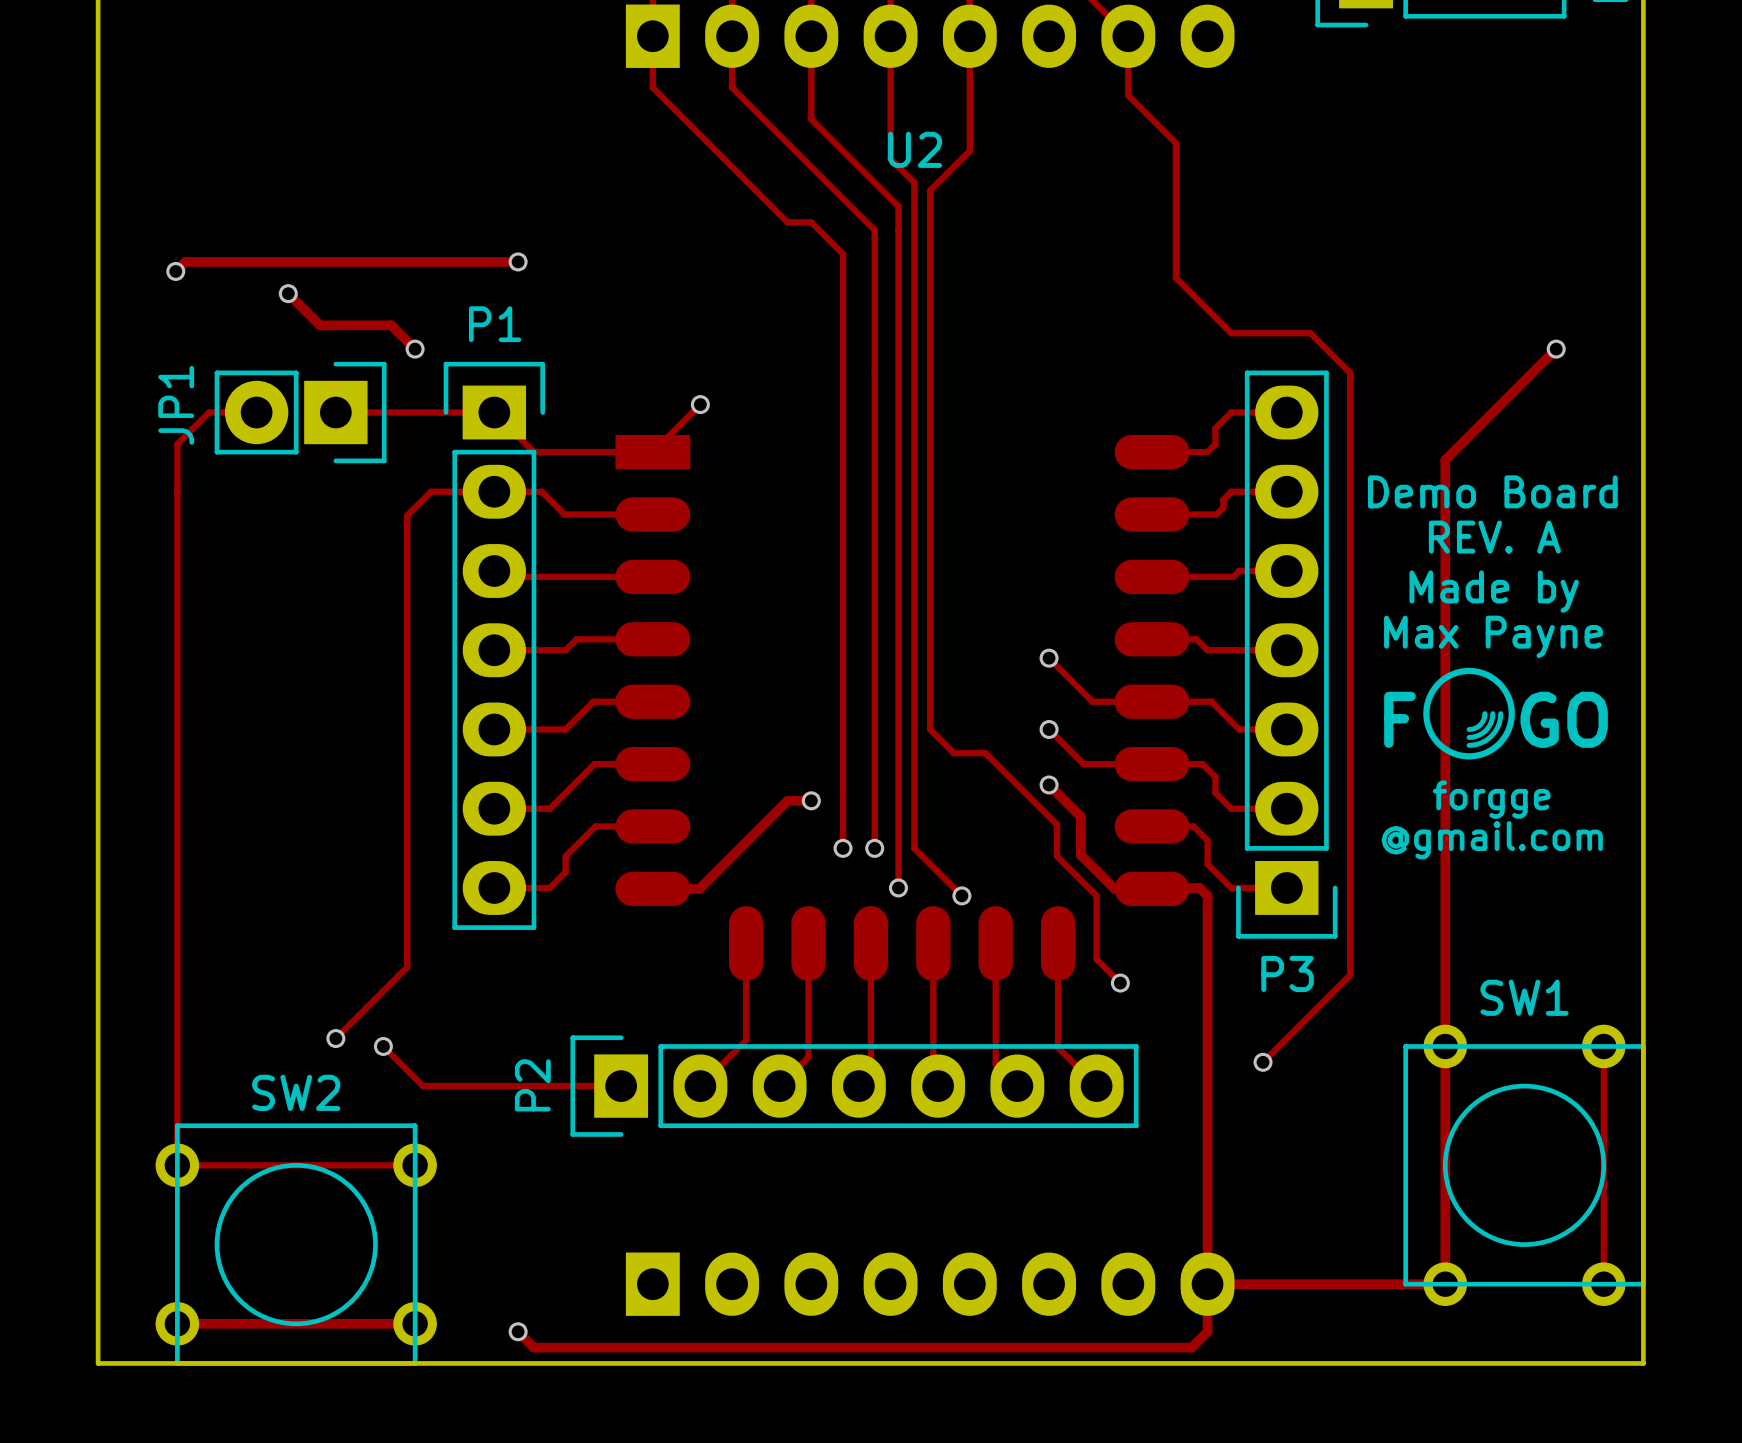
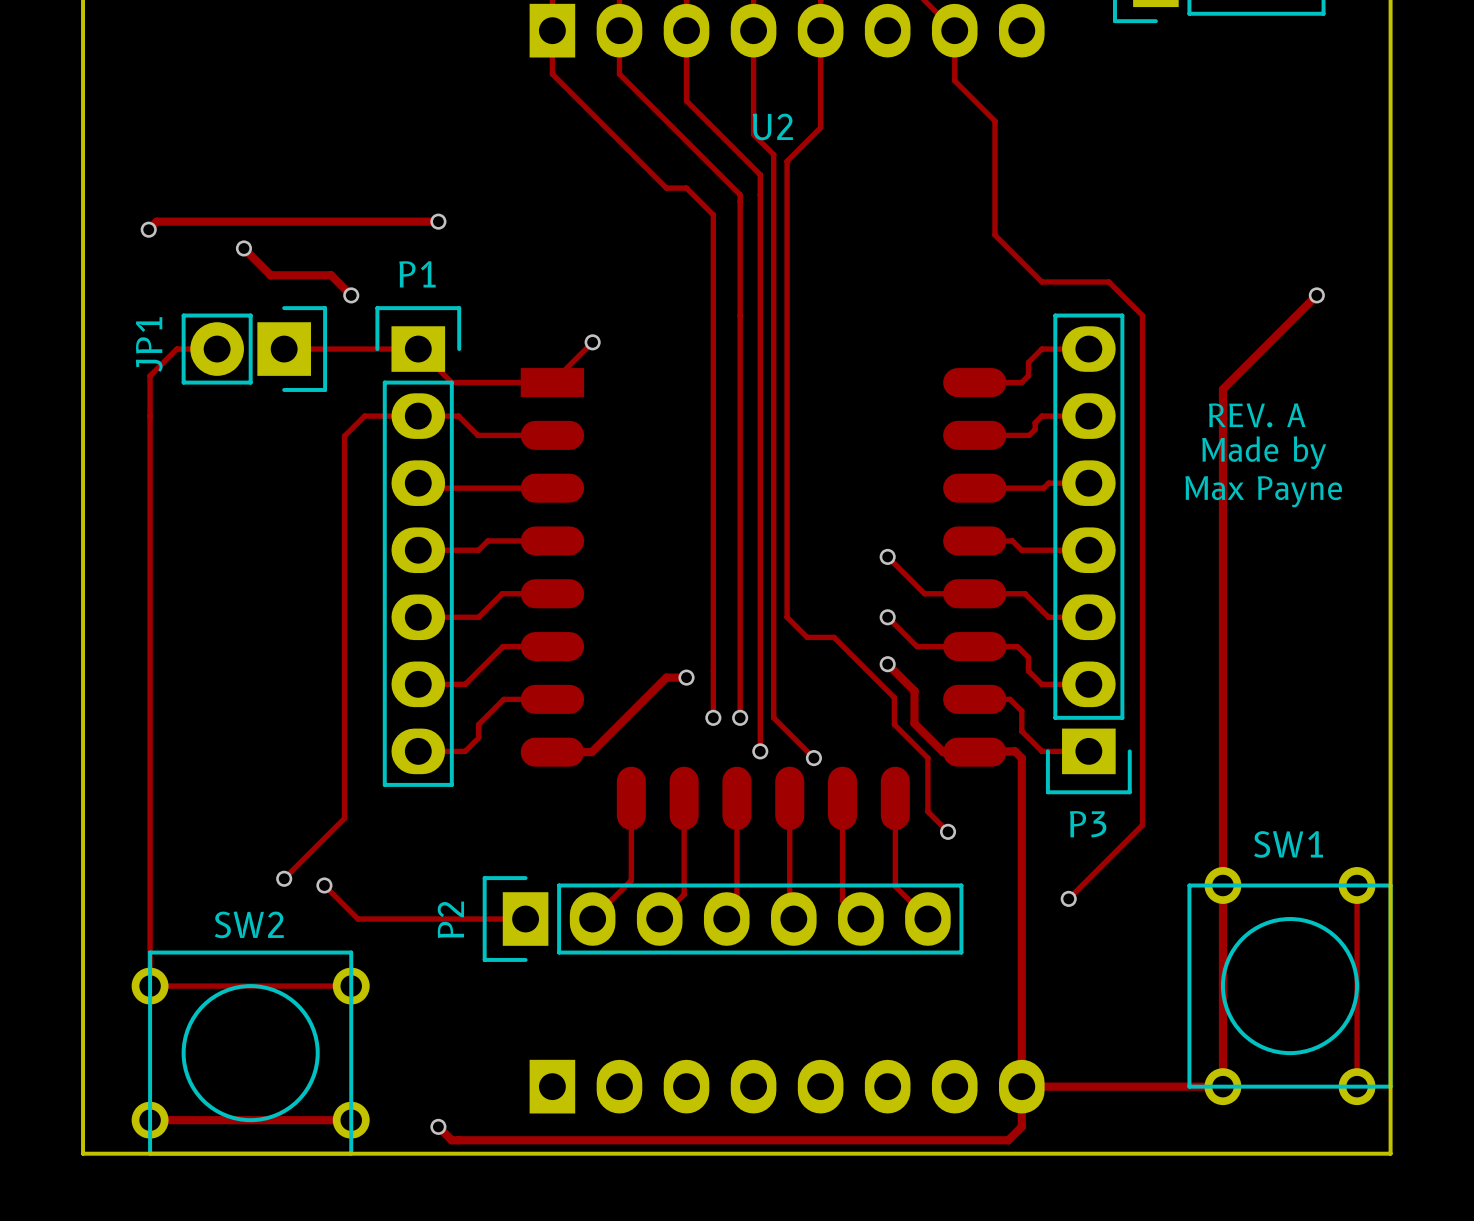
text: Demo Board (1492, 491) -> REV. A (1257, 415)
text: REV. A (1494, 537) -> Made by (1264, 452)
text: Made by (1494, 591) -> Max Payne (1263, 491)
text: Max Payne (1493, 636) -> none
drawing: [1423, 667, 1515, 760] -> none
line: (1484, 713) (1480, 724) (1469, 729) -> none
line: (1492, 713) (1491, 722) (1485, 730) (1478, 735) (1469, 737) -> none
line: (1500, 713) (1498, 725) (1491, 736) (1481, 742) (1469, 745) -> none
text: F (1399, 719) -> none
text: GO (1564, 719) -> none
text: forgge (1491, 799) -> none
text: @gmail.com (1492, 840) -> none

